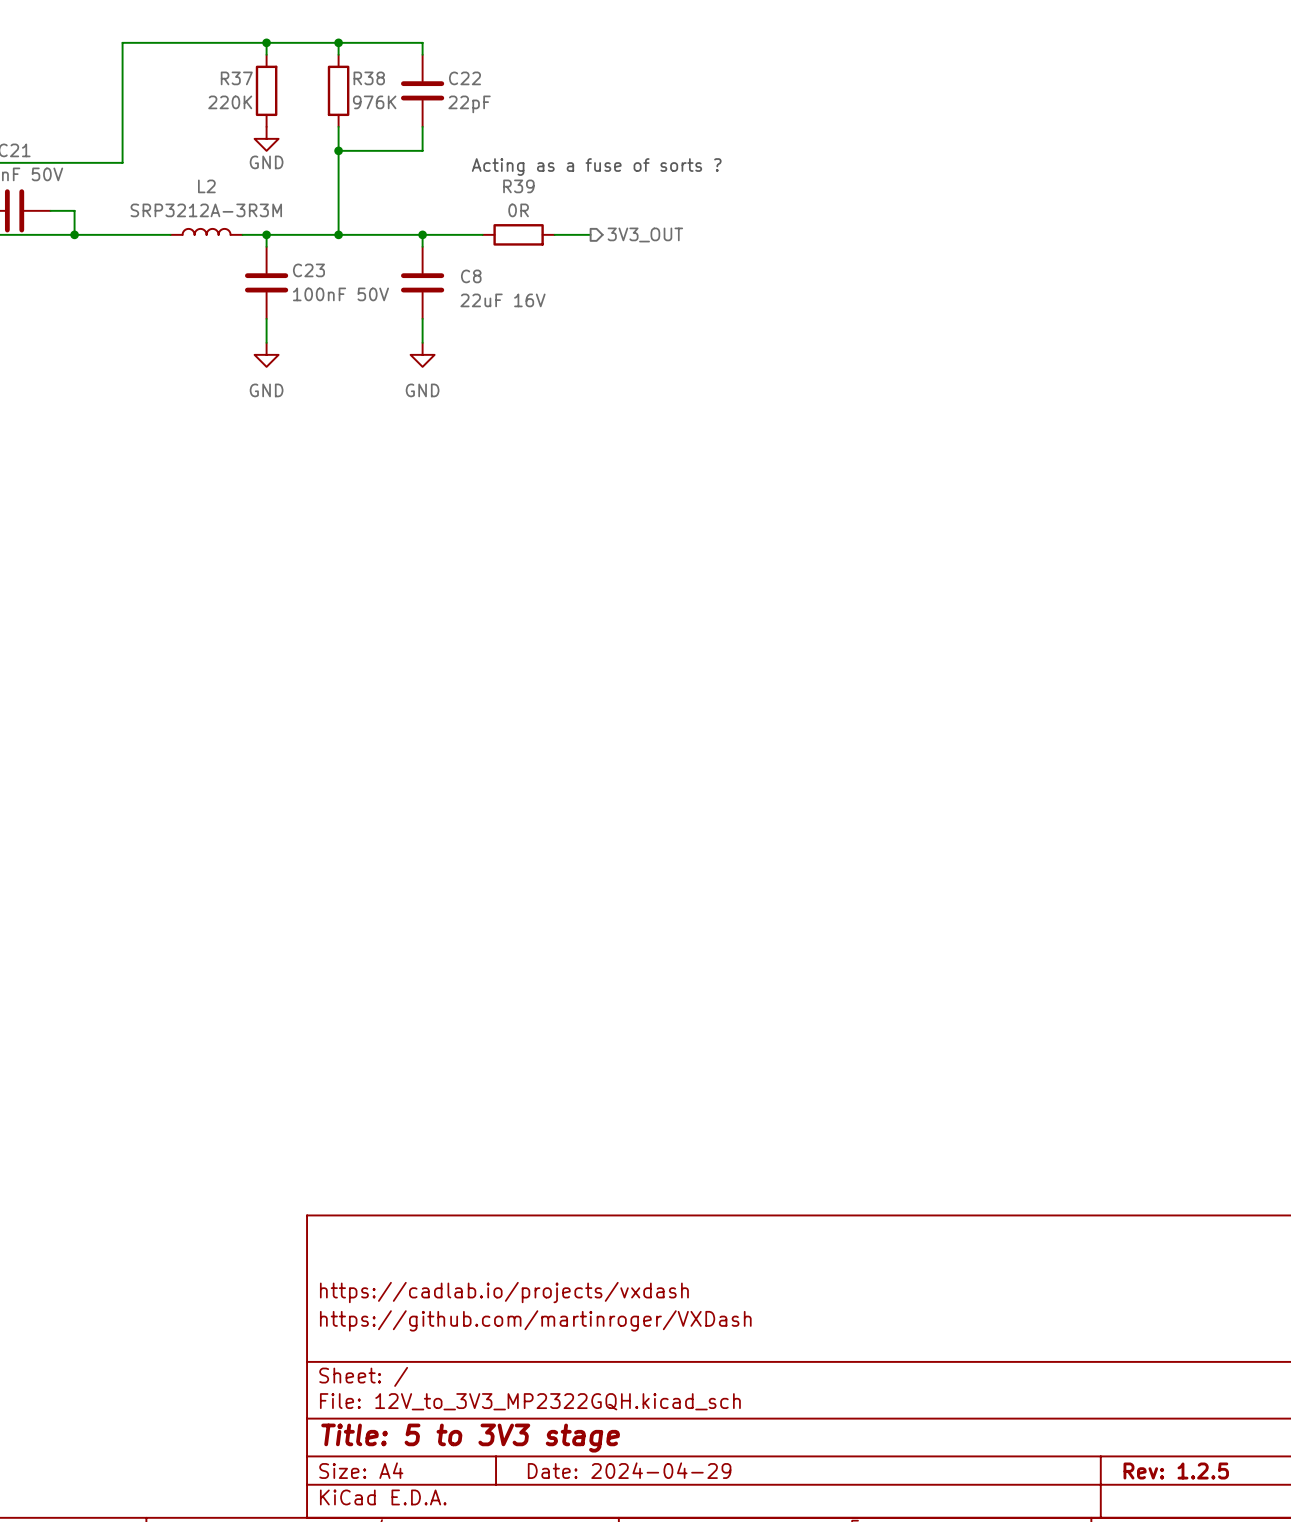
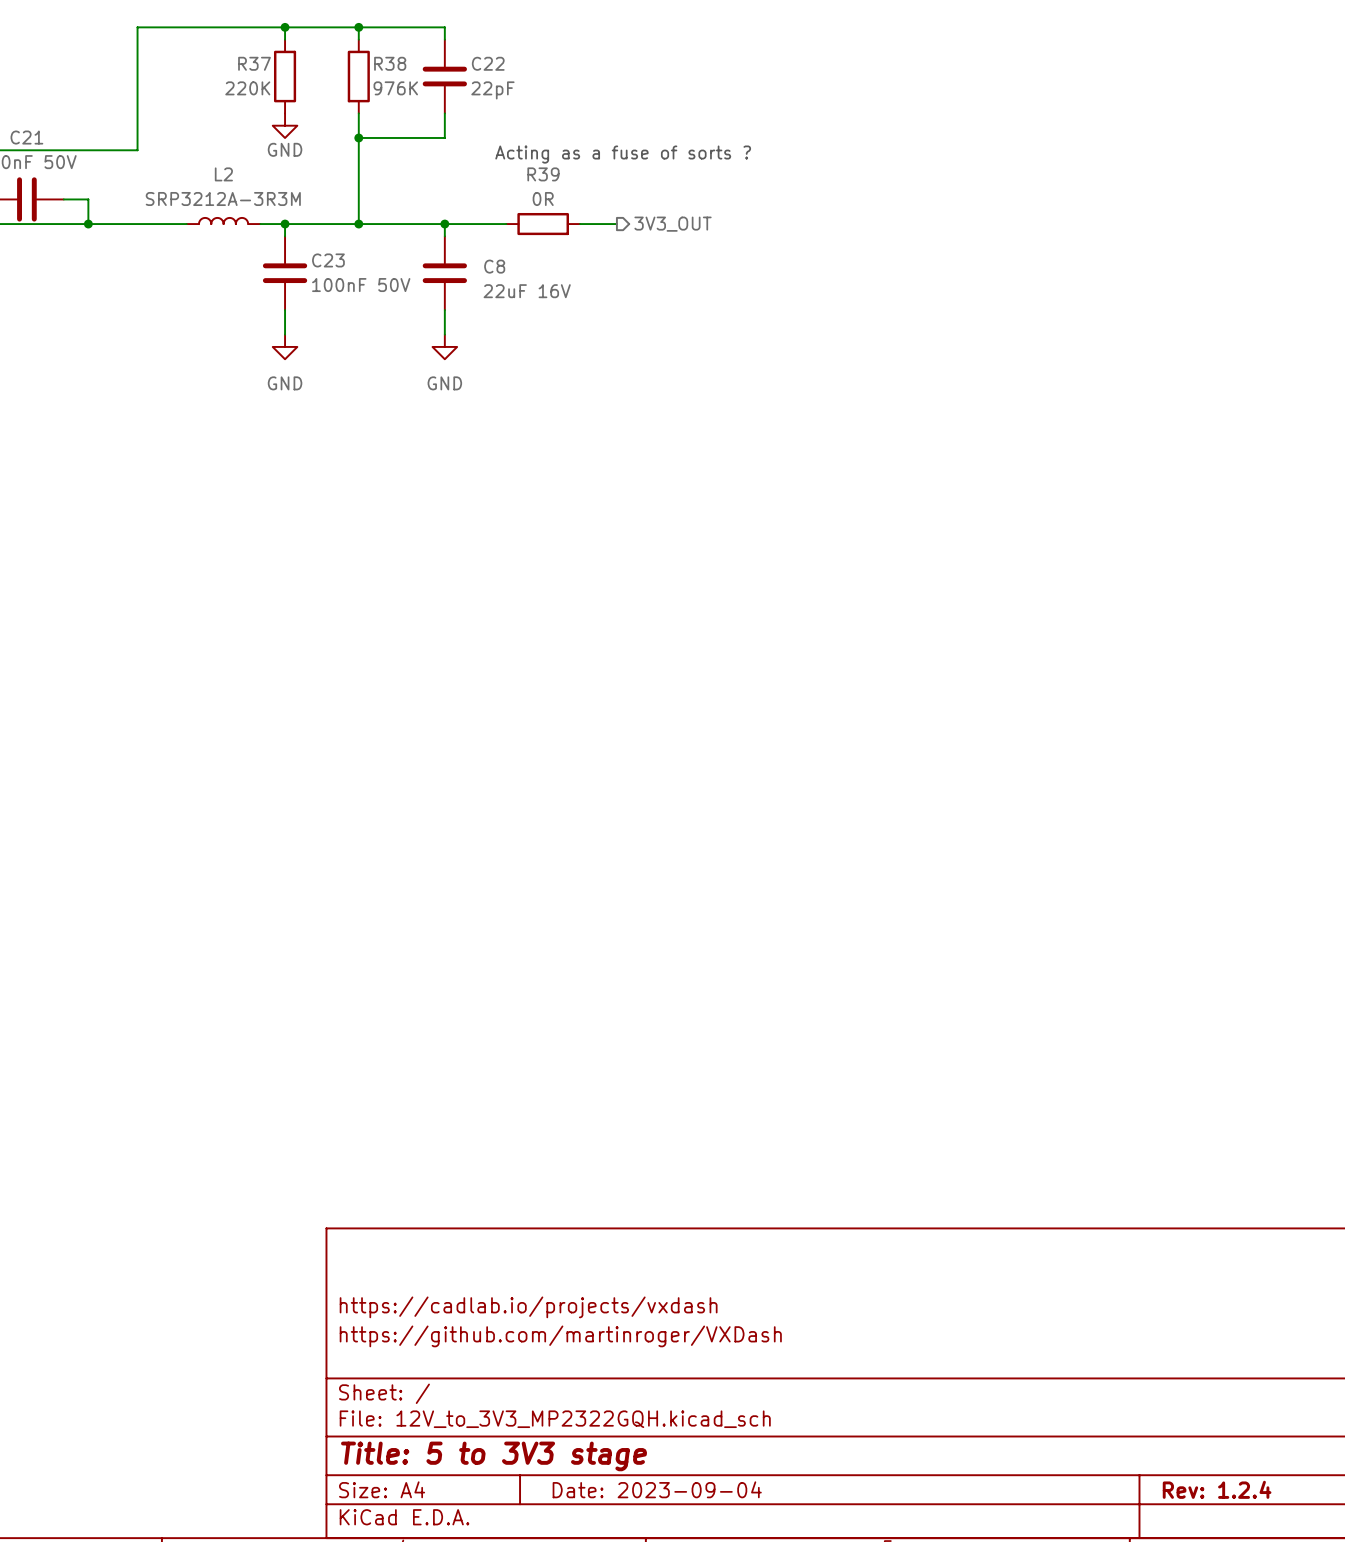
title block: Date: 2024-04-29 (629, 1470) -> Date: 2023-09-04 (657, 1489)
title block: Rev: 1.2.5 (1176, 1471) -> Rev: 1.2.4 (1217, 1489)

